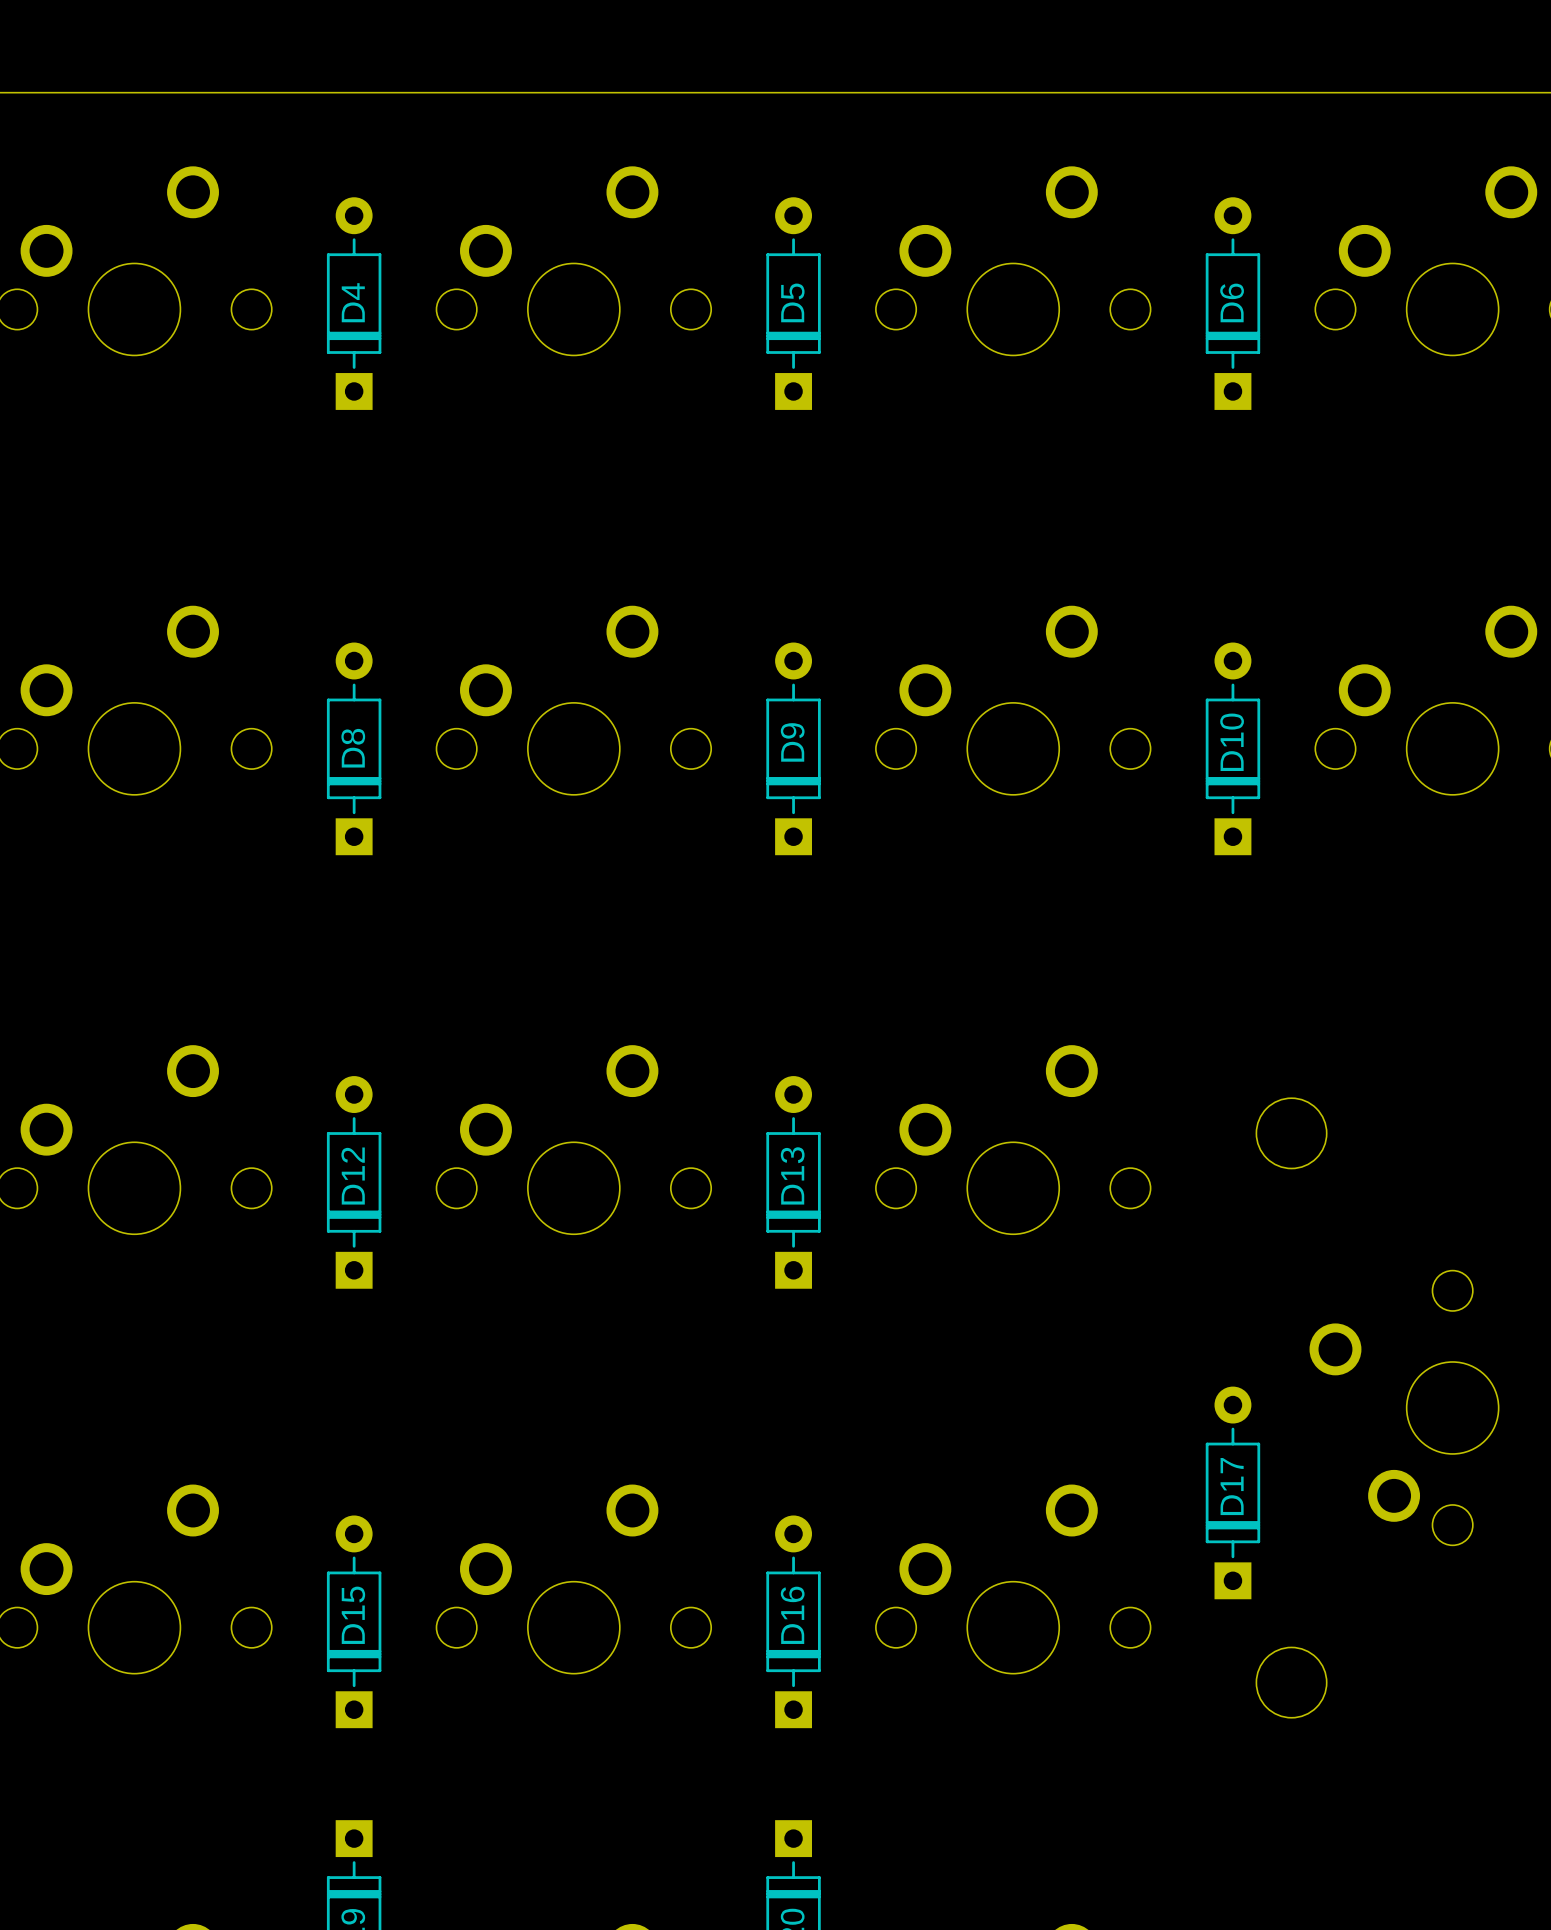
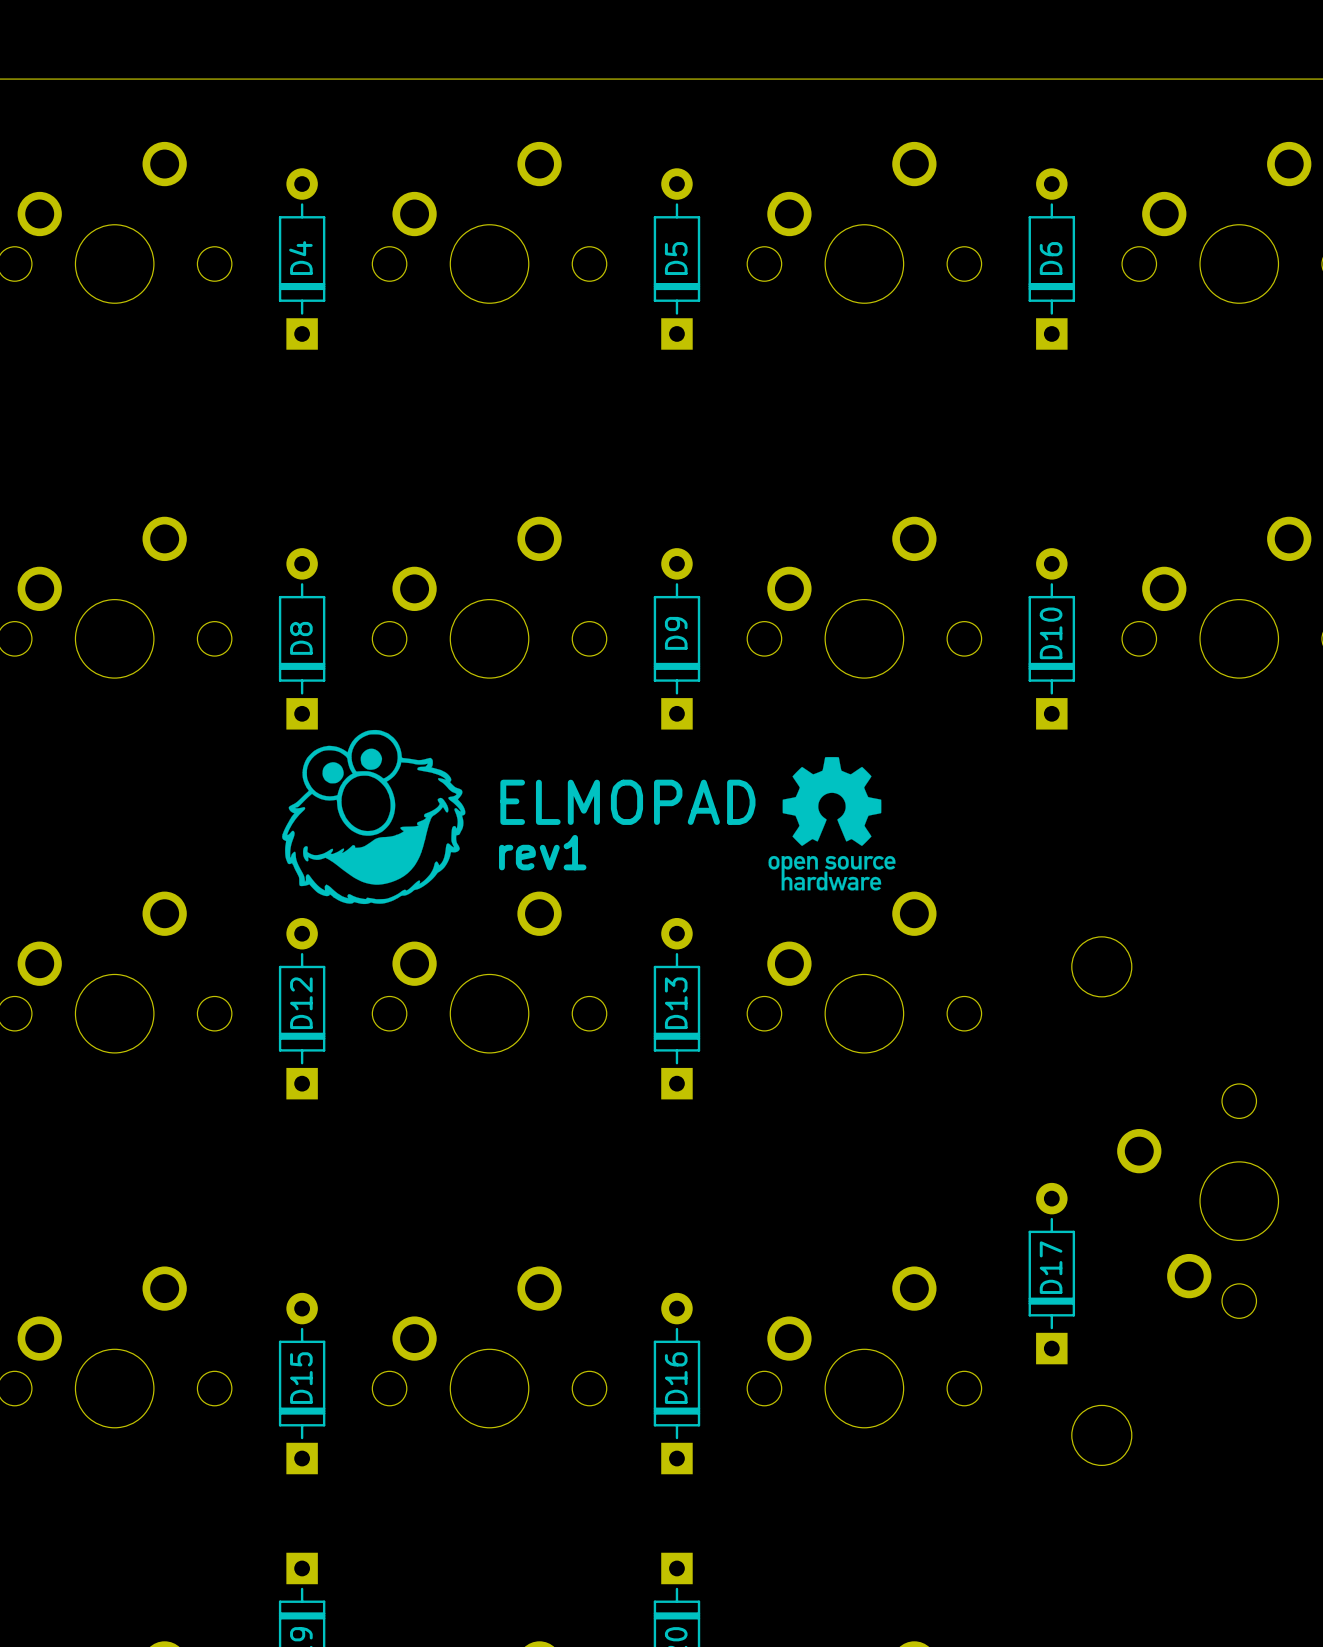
drawing: none -> [282, 729, 466, 905]
drawing: none -> [768, 757, 896, 891]
text: none -> ELMOPAD (627, 802)
text: none -> rev1 (542, 852)

